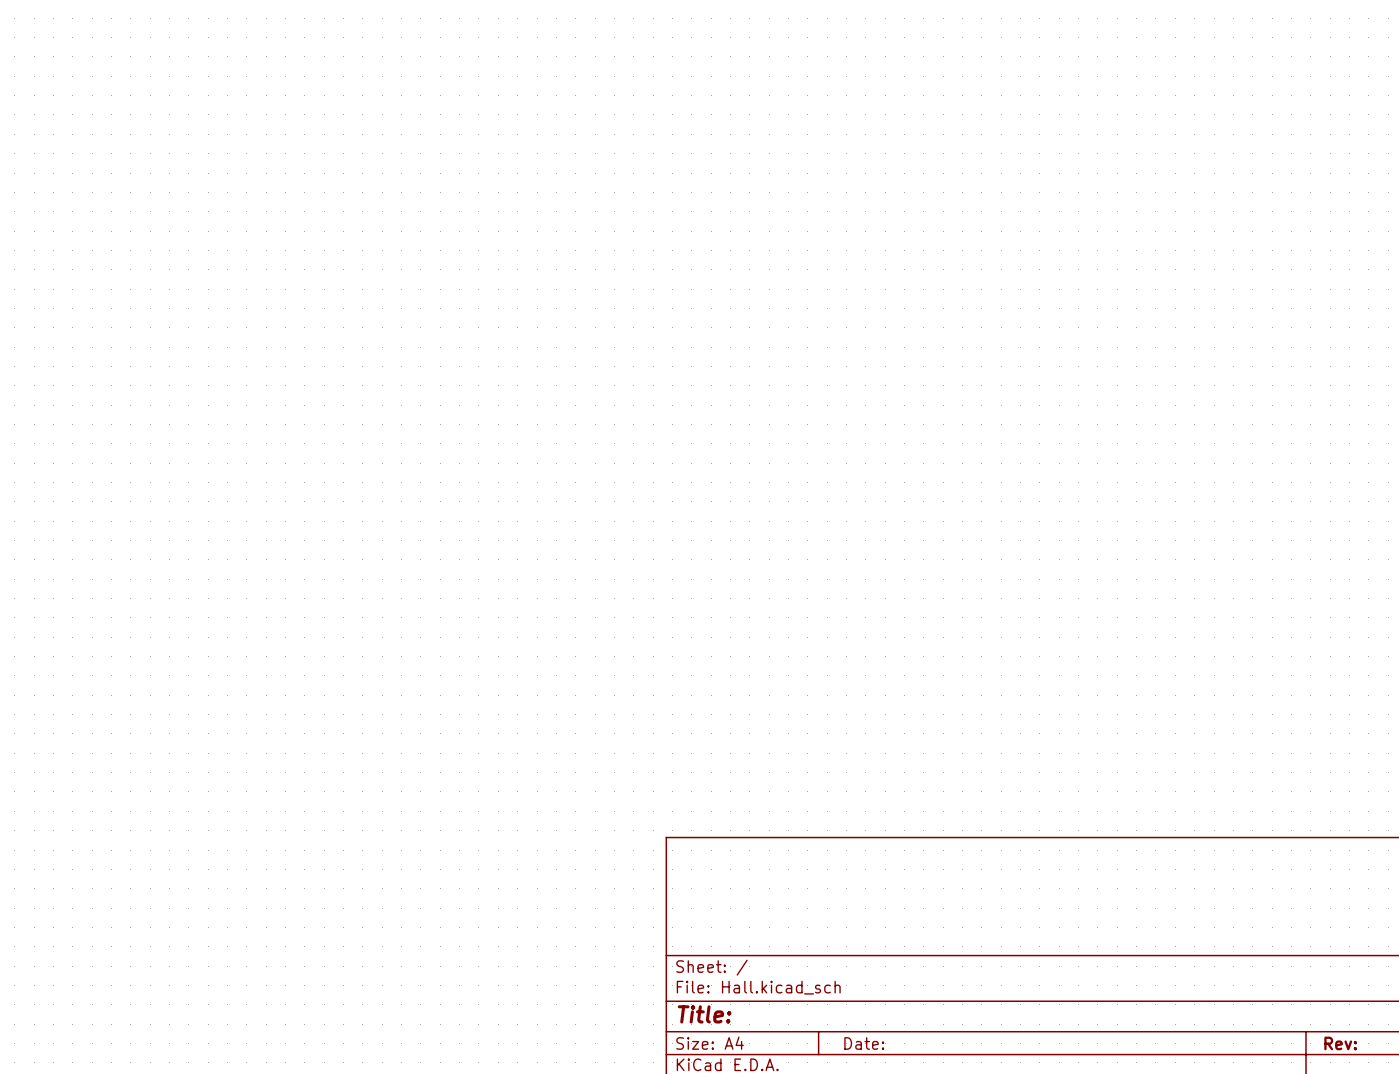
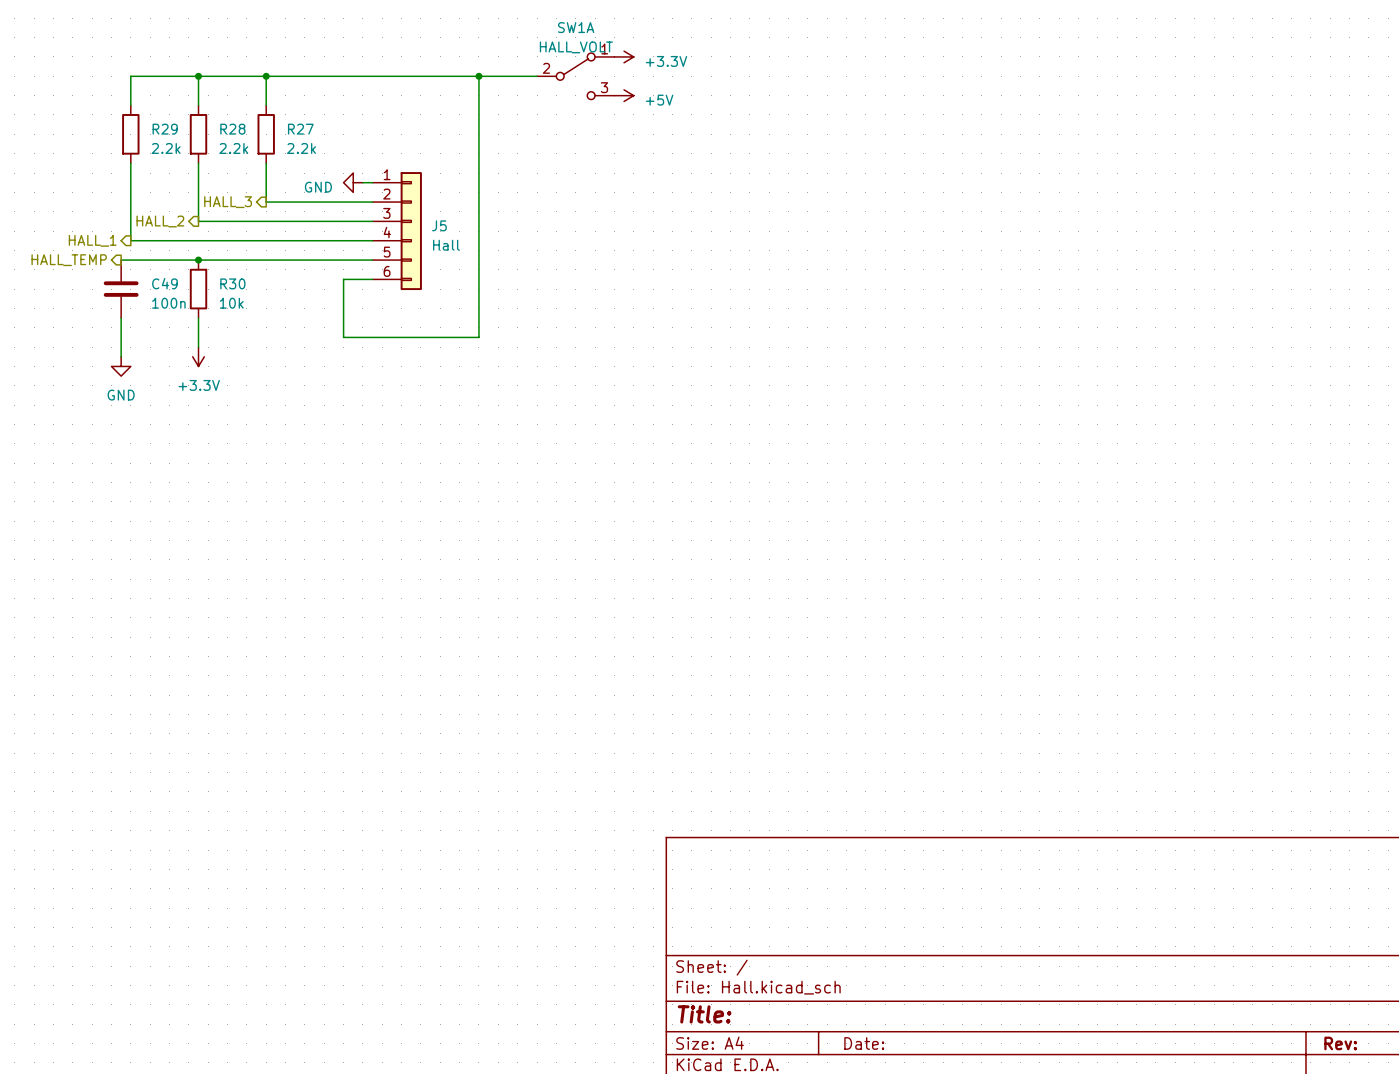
power symbol: none -> +3.3V (624, 56)
wire: none -> (198, 76) (198, 105)
junction: none -> (198, 76)
wire: none -> (266, 76) (266, 105)
junction: none -> (266, 76)
wire: none -> (478, 76) (478, 337) (343, 337) (343, 279) (372, 279)
junction: none -> (478, 76)
wire: none -> (537, 76) (130, 76) (130, 105)
SW1A: none -> HALL_VOLT (575, 76)
power symbol: none -> +5V (624, 95)
R29: none -> 2.2k (130, 134)
R28: none -> 2.2k (198, 134)
R27: none -> 2.2k (266, 134)
wire: none -> (130, 163) (130, 240) (372, 240)
wire: none -> (198, 163) (198, 221) (372, 221)
wire: none -> (266, 163) (266, 202) (372, 202)
power symbol: none -> GND (353, 182)
wire: none -> (362, 182) (372, 182)
hierarchical label: none -> HALL_3 (228, 202)
hierarchical label: none -> HALL_2 (160, 221)
J5: none -> Hall (397, 231)
hierarchical label: none -> HALL_1 (92, 240)
hierarchical label: none -> HALL_TEMP (69, 260)
wire: none -> (121, 260) (372, 260)
junction: none -> (198, 260)
C49: none -> 100n (121, 289)
R30: none -> 10k (198, 289)
wire: none -> (121, 318) (121, 356)
wire: none -> (198, 318) (198, 347)
power symbol: none -> +3.3V (198, 356)
power symbol: none -> GND (121, 366)

